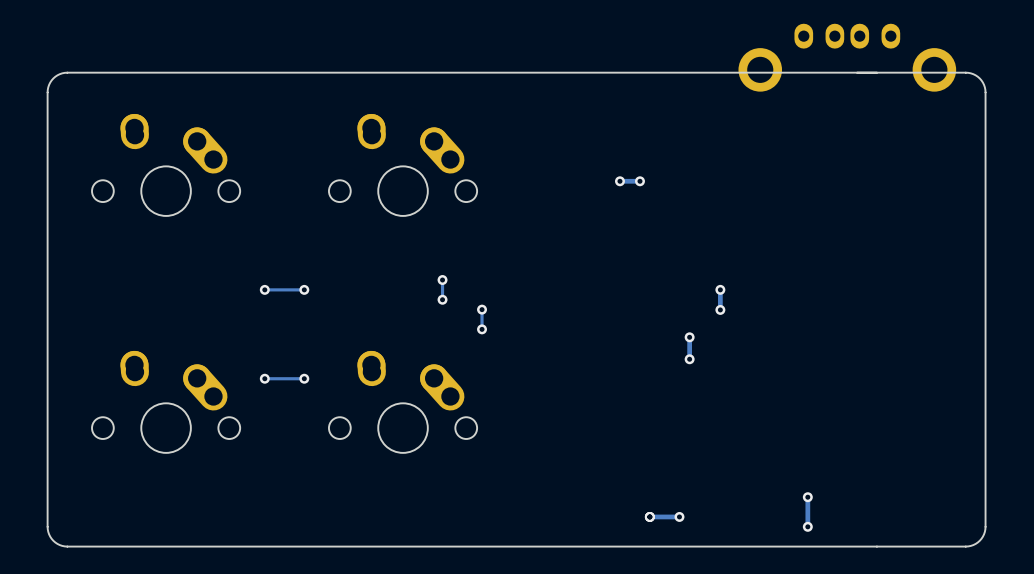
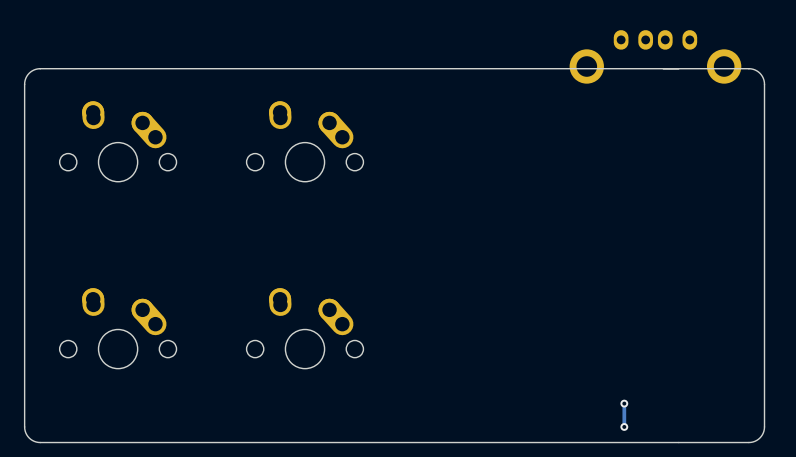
via: (619, 181) -> none
track: (639, 181) (619, 181) -> none
via: (639, 181) -> none
track: (442, 280) (442, 299) -> none
via: (442, 280) -> none
via: (264, 289) -> none
track: (304, 289) (264, 289) -> none
via: (304, 289) -> none
track: (720, 289) (720, 309) -> none
via: (720, 289) -> none
via: (442, 299) -> none
track: (482, 309) (482, 329) -> none
via: (482, 309) -> none
via: (720, 309) -> none
via: (482, 329) -> none
track: (689, 337) (689, 358) -> none
via: (689, 337) -> none
via: (689, 359) -> none
via: (264, 378) -> none
track: (304, 378) (264, 378) -> none
via: (304, 378) -> none
via: (649, 516) -> none
track: (679, 516) (649, 516) -> none
via: (679, 516) -> none

